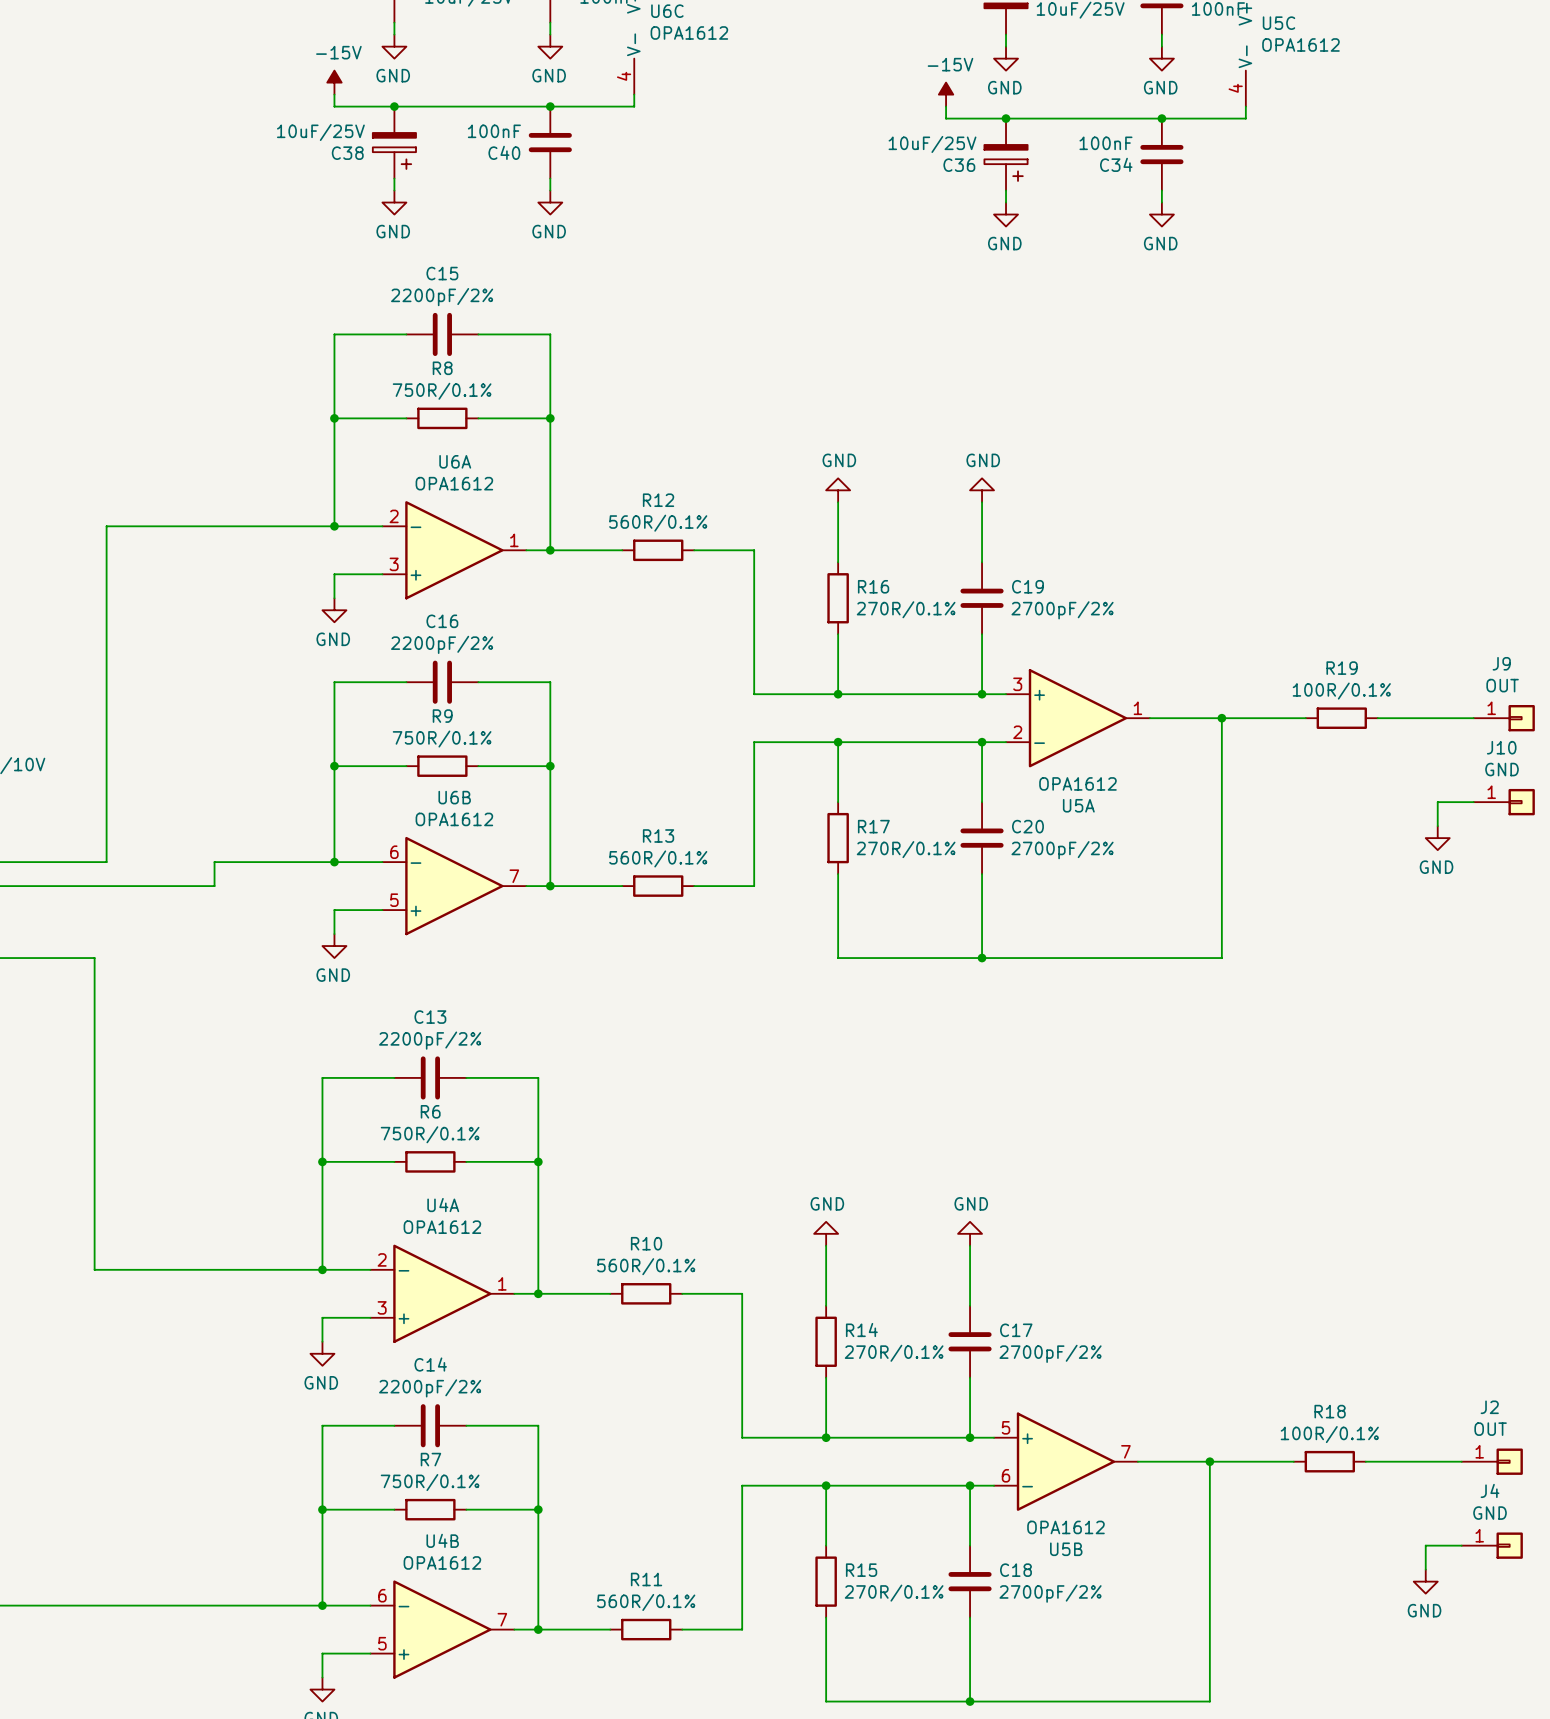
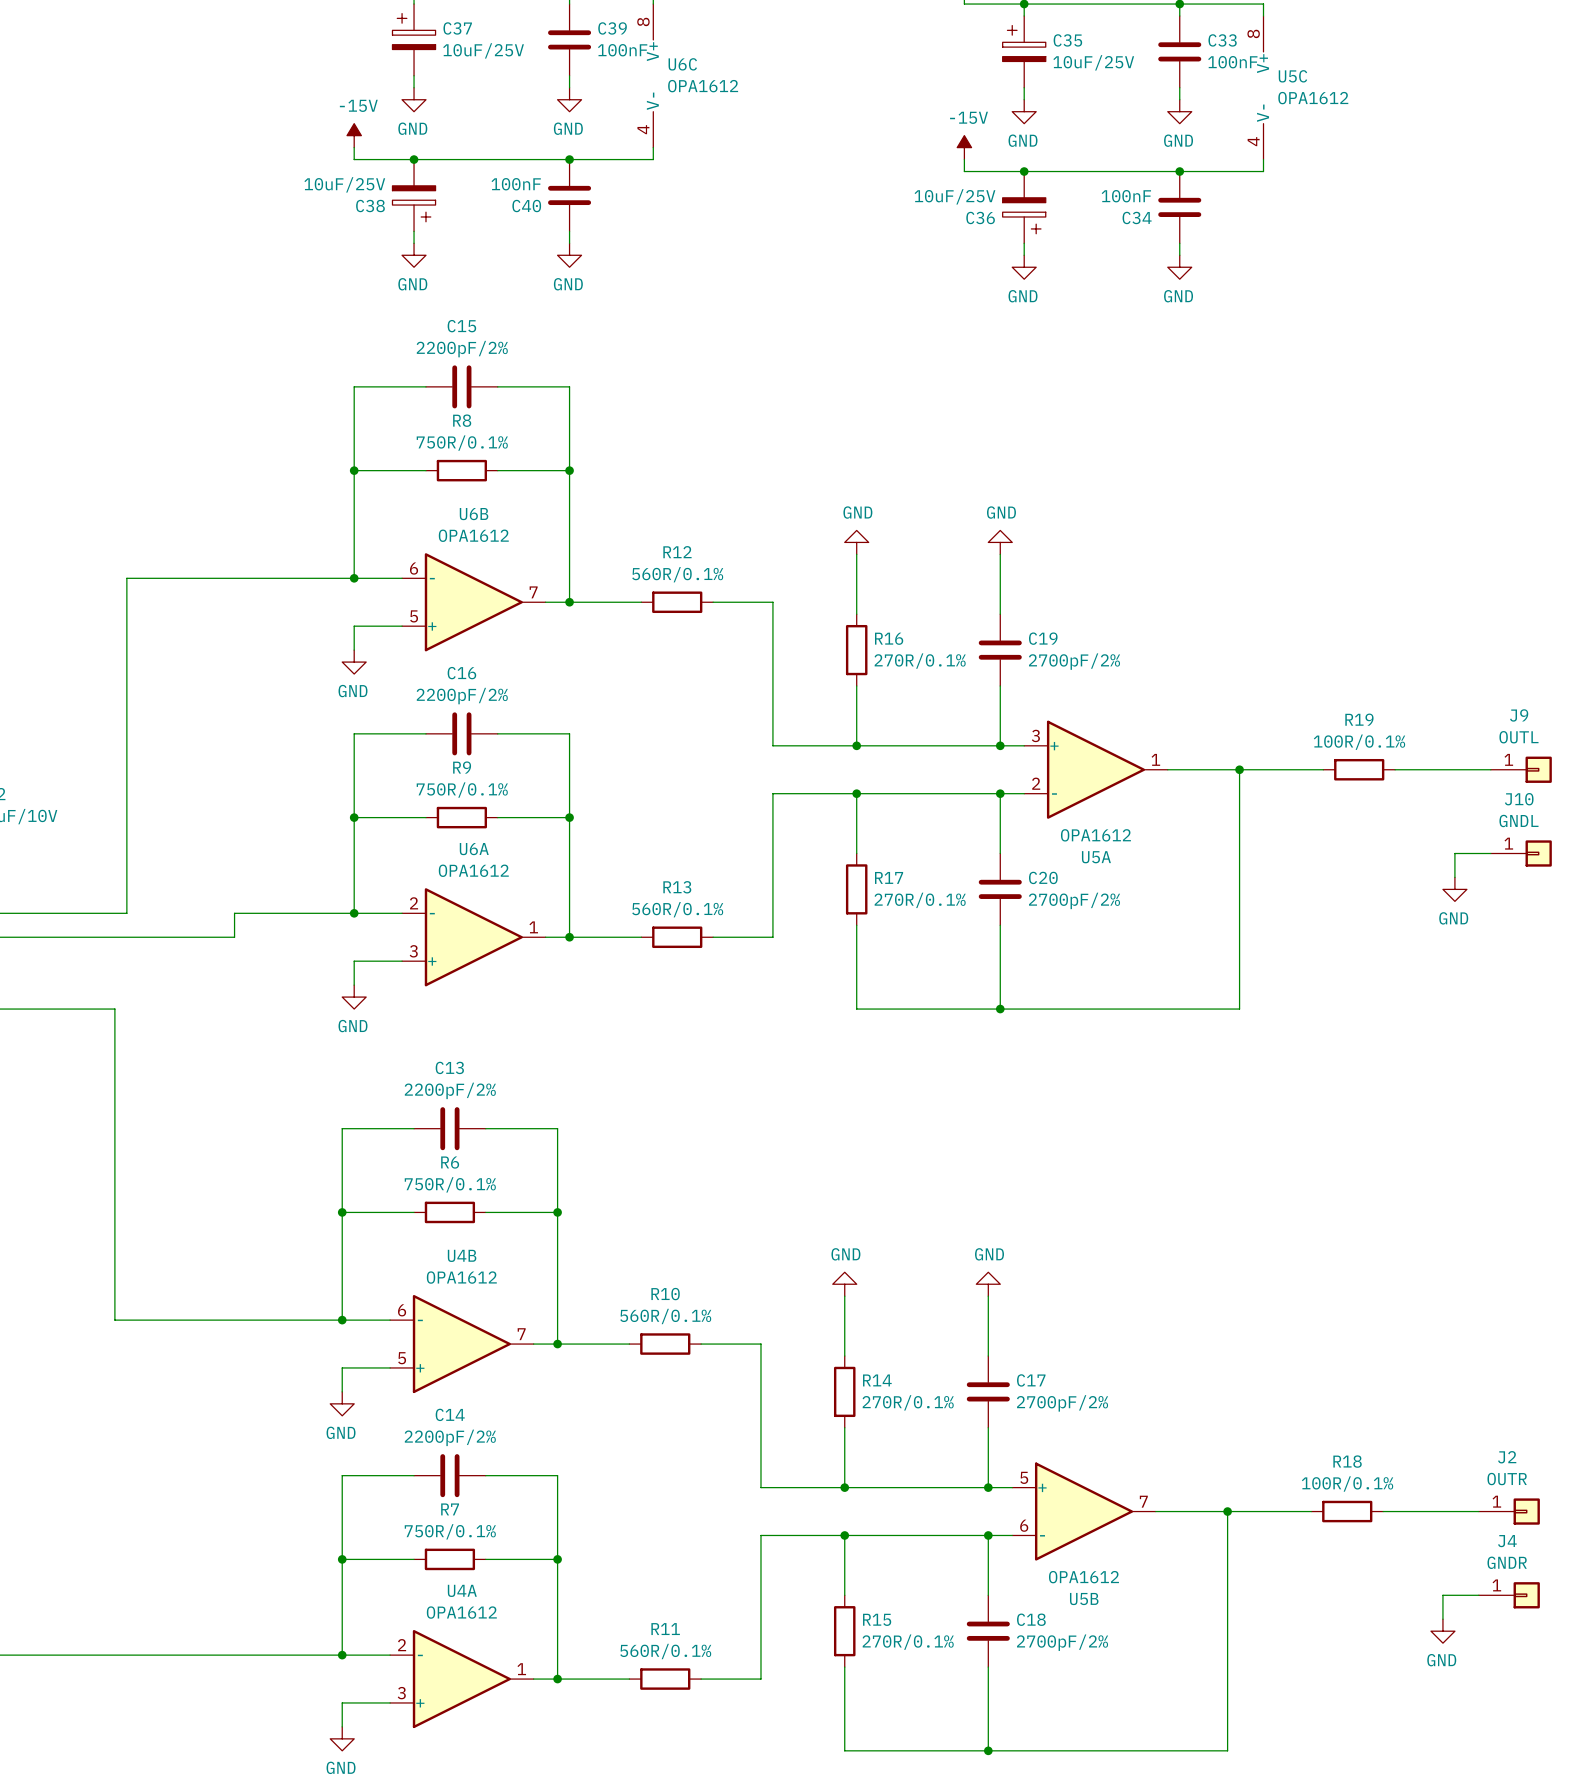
U6A position: (454, 550) -> (473, 937)
J9 value: OUT (1502, 685) -> OUTL (1518, 737)
J10 value: GND (1502, 769) -> GNDL (1518, 820)
U6B position: (454, 886) -> (473, 602)
U4A position: (442, 1293) -> (461, 1679)
J2 value: OUT (1490, 1429) -> OUTR (1507, 1479)
J4 value: GND (1490, 1513) -> GNDR (1507, 1562)
U4B position: (442, 1629) -> (461, 1344)

